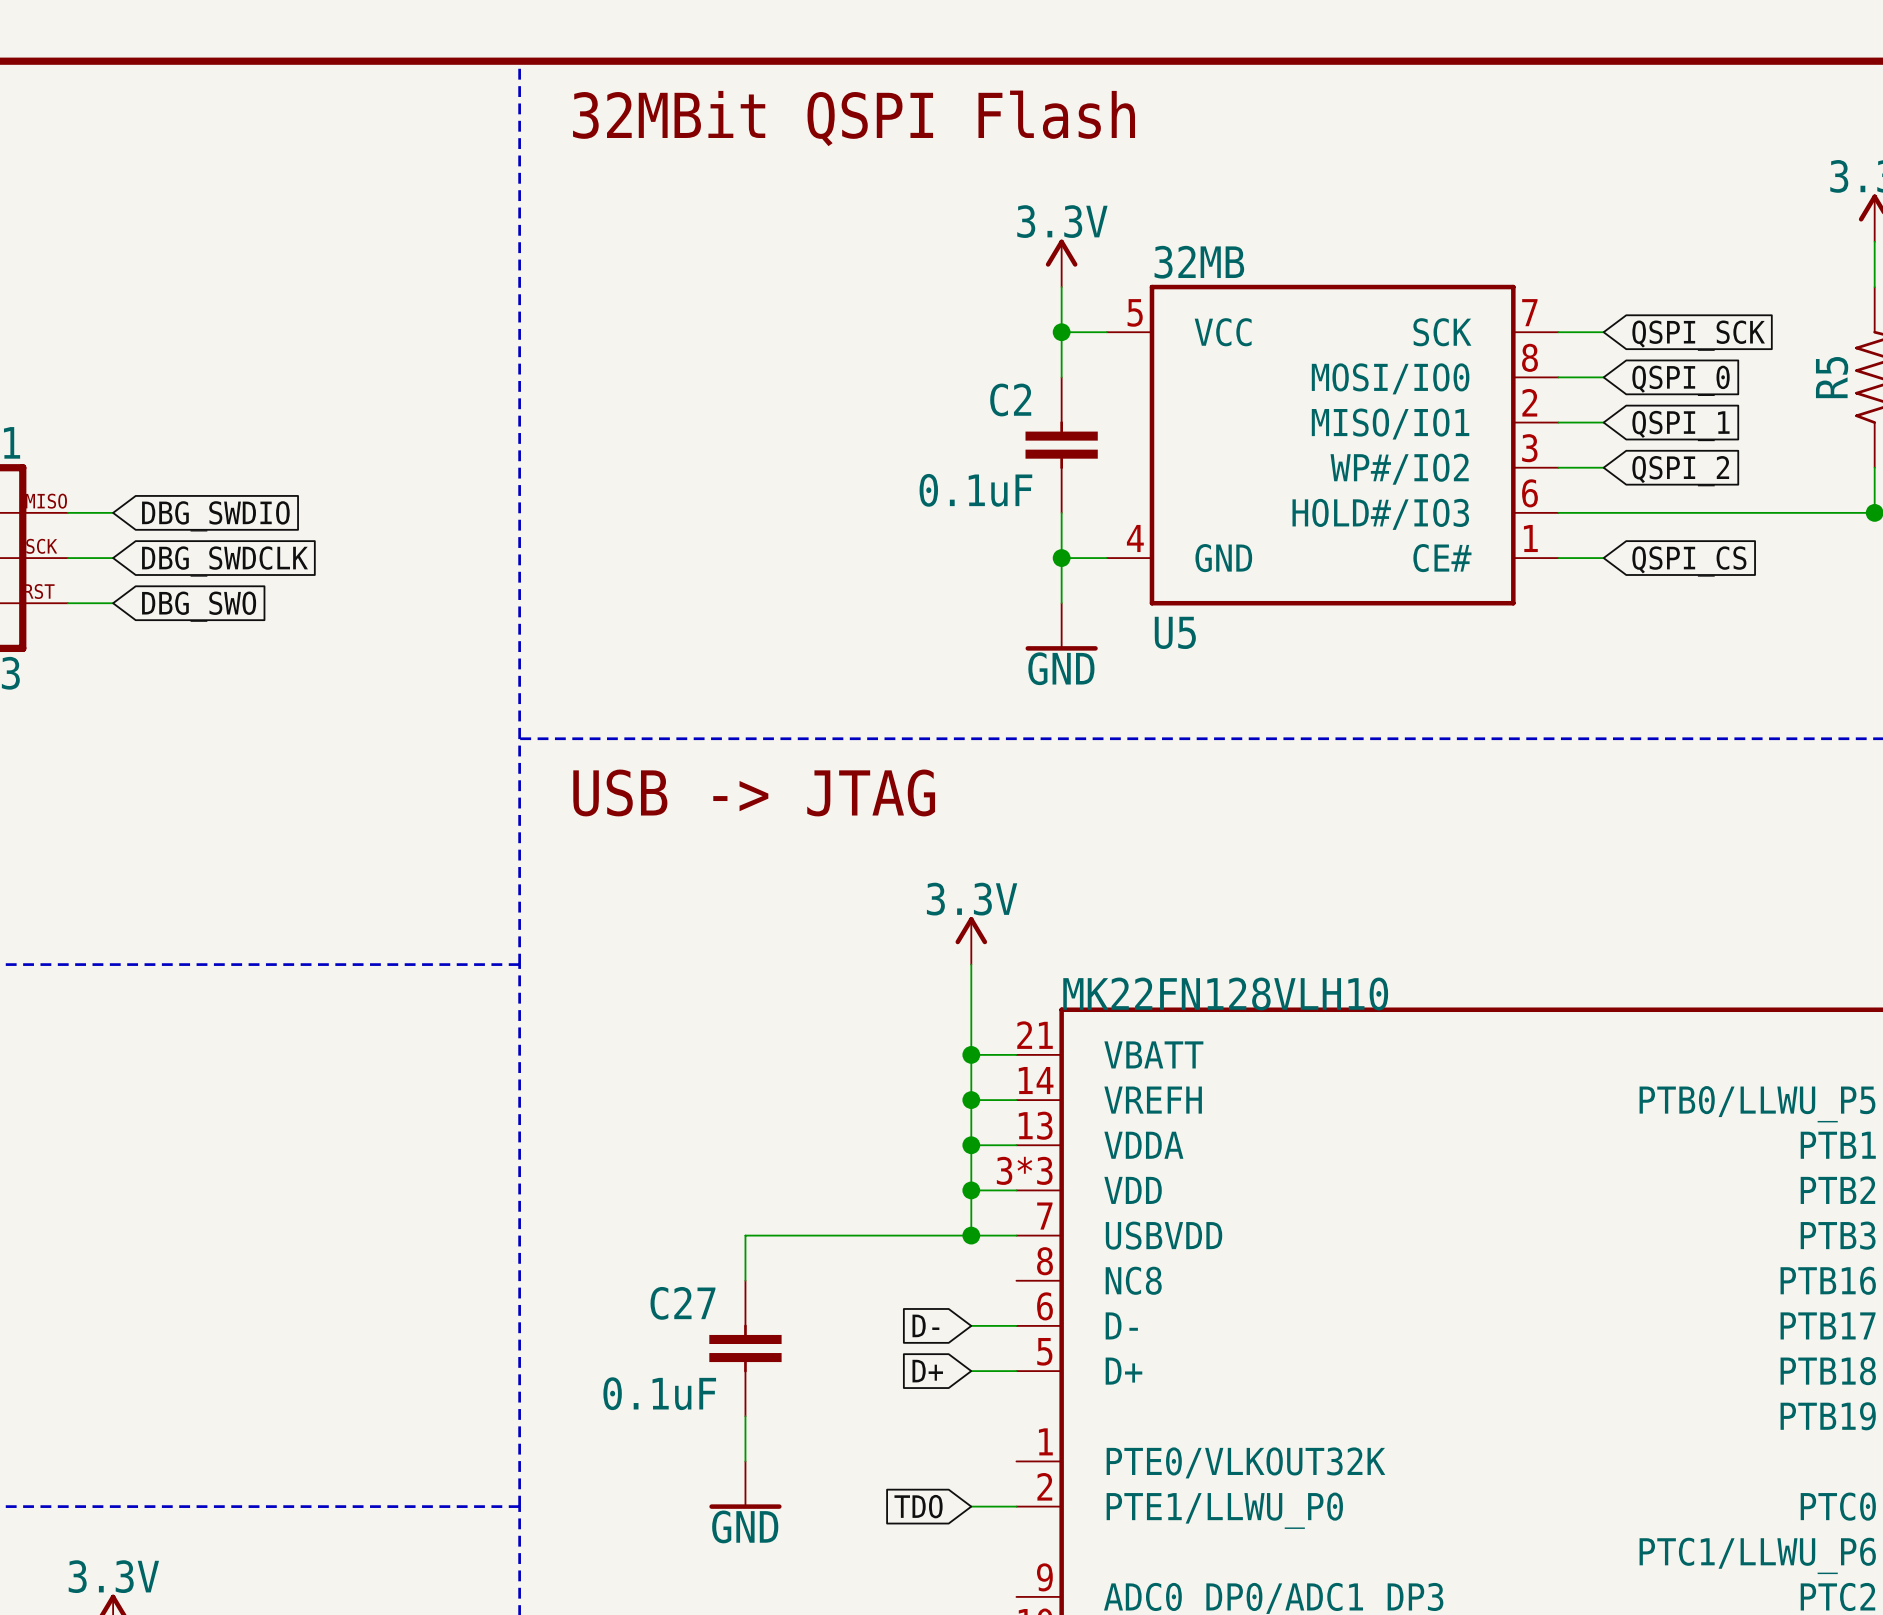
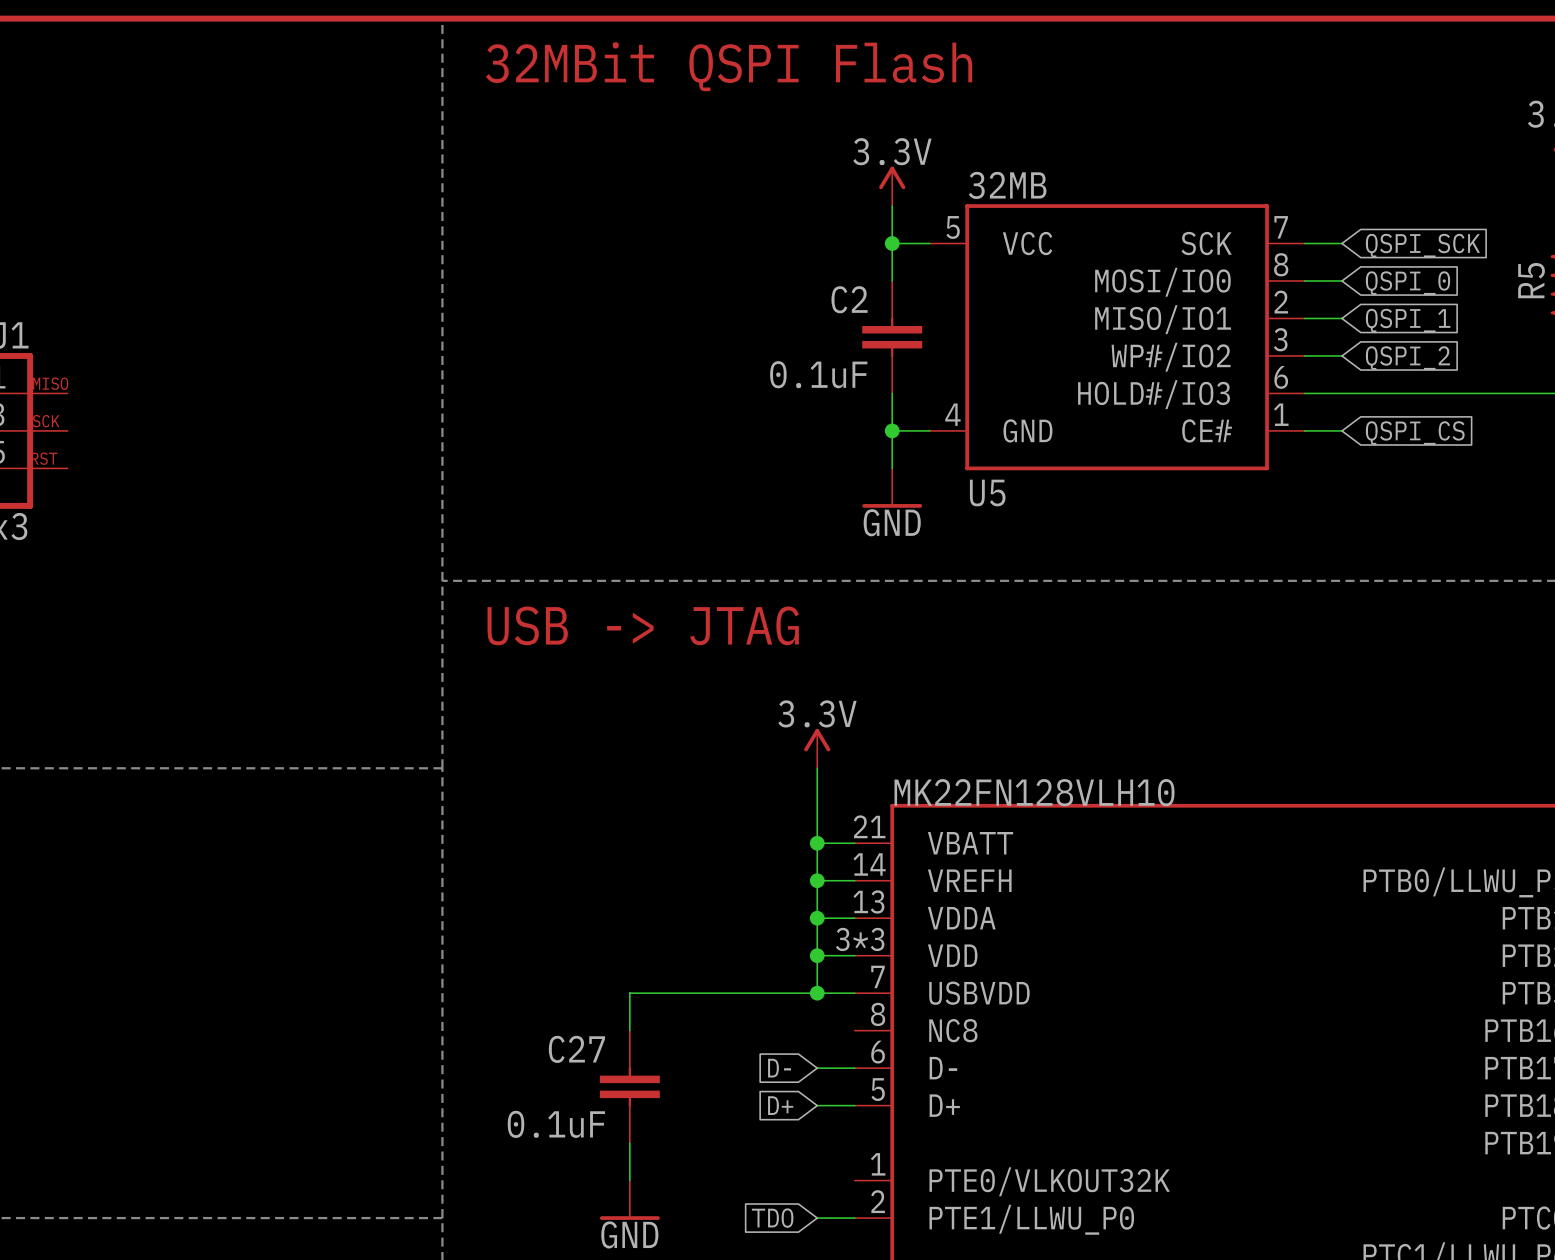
wire: (67, 512) (113, 512) -> none
global label: DBG_SWDIO (215, 516) -> none
wire: (67, 558) (113, 558) -> none
global label: DBG_SWDCLK (225, 561) -> none
wire: (67, 603) (113, 603) -> none
global label: DBG_SWO (199, 606) -> none

